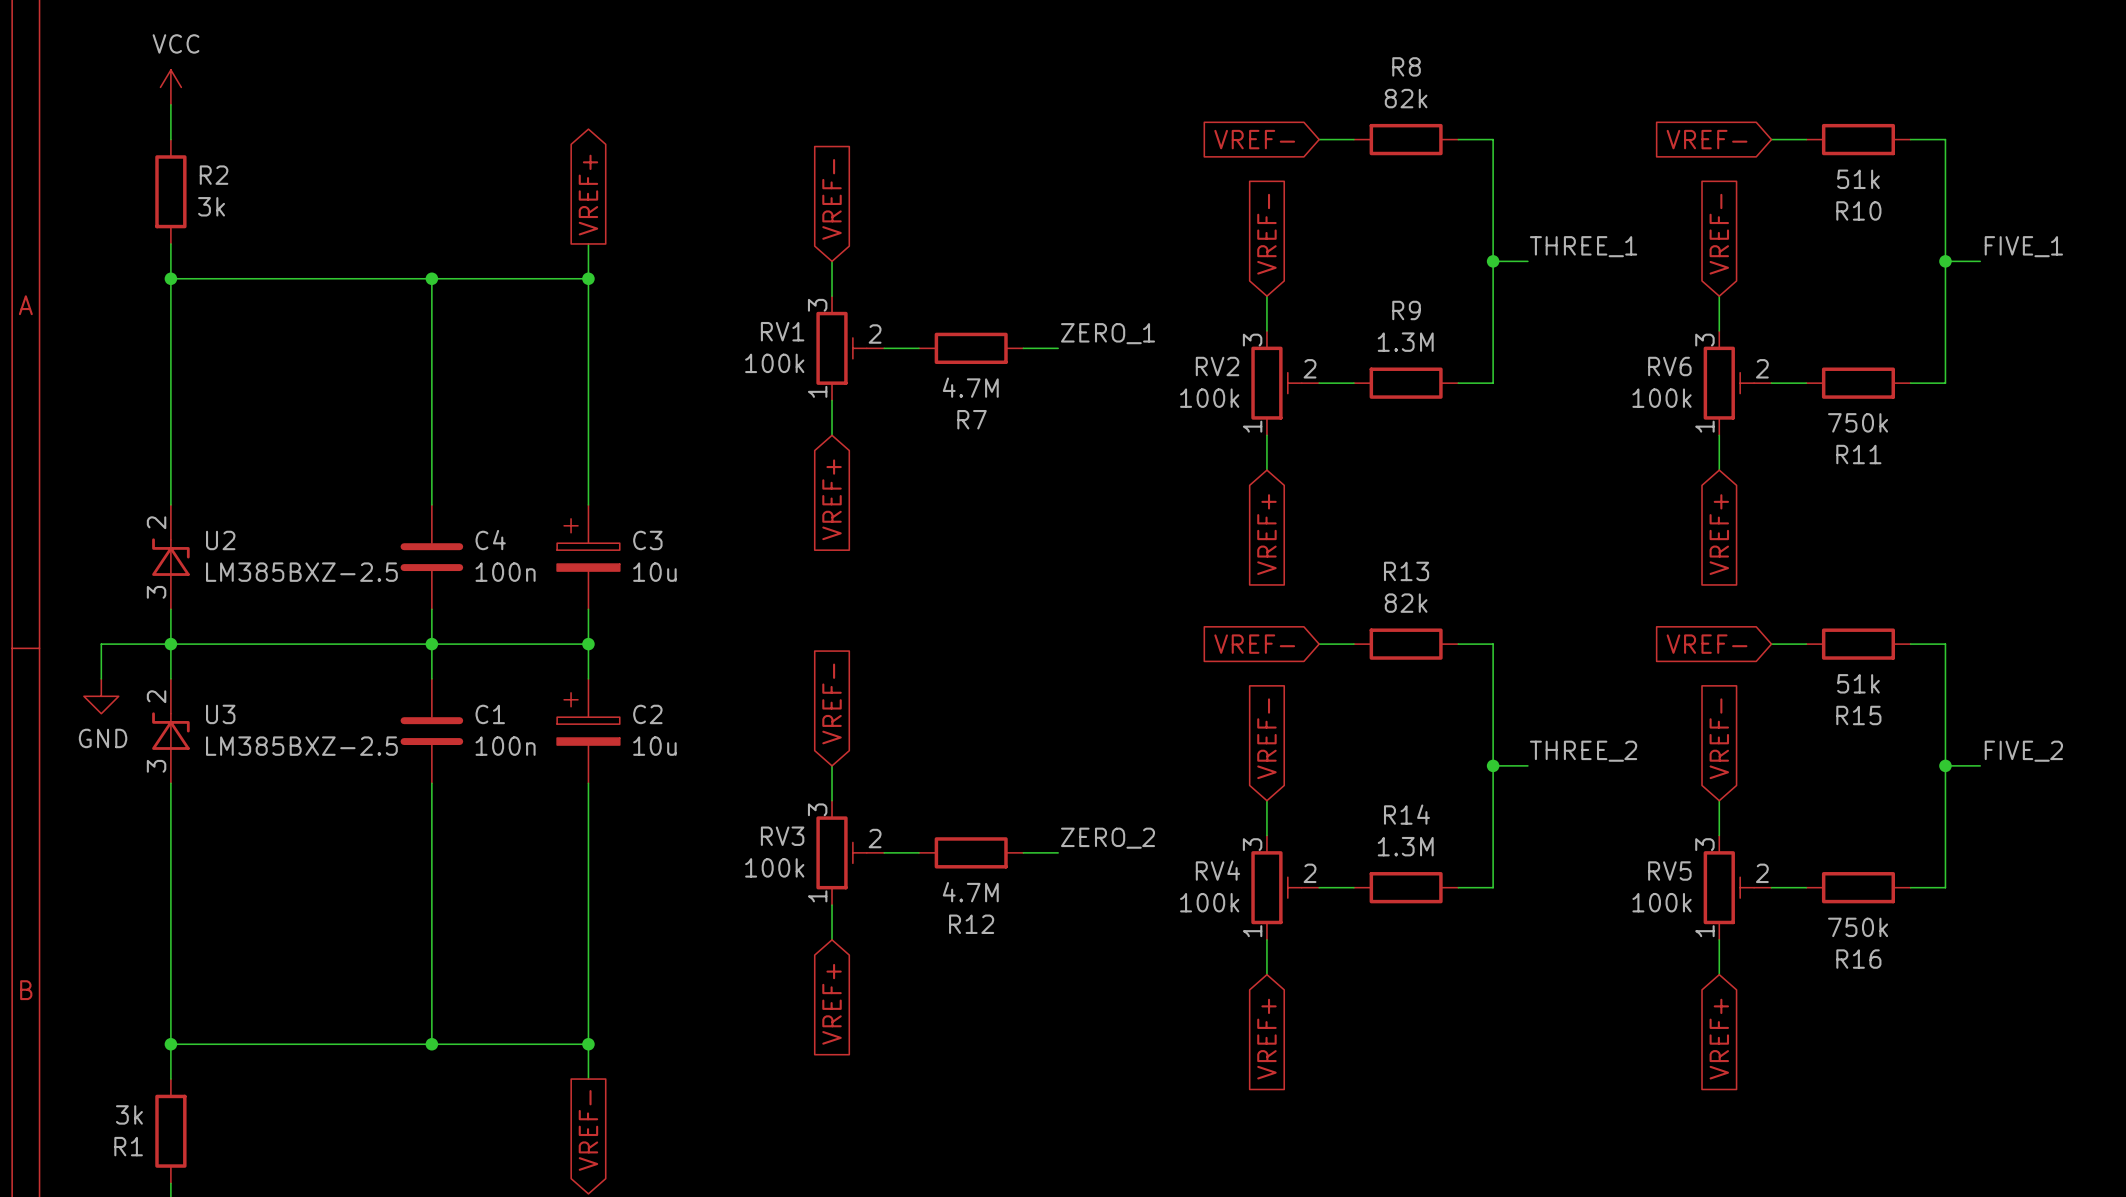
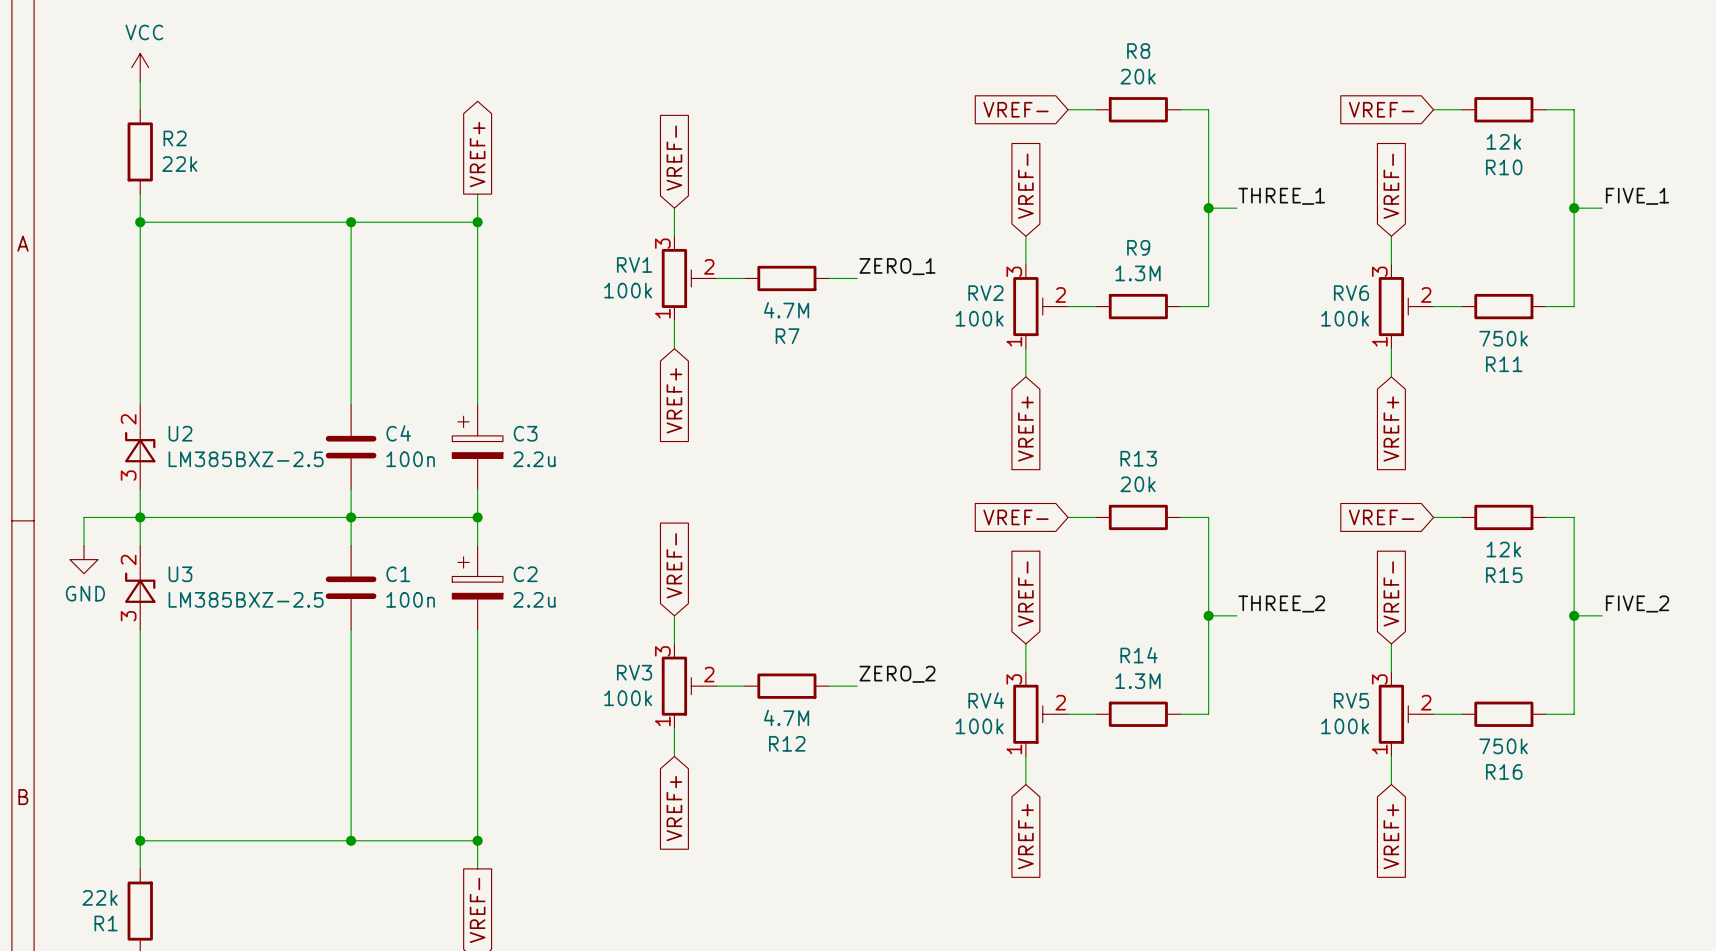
R8 value: 82k (1406, 98) -> 20k (1138, 76)
R10 value: 51k (1858, 179) -> 12k (1503, 141)
R2 value: 3k (211, 206) -> 22k (179, 164)
C3 value: 10u (654, 572) -> 2.2u (534, 459)
R13 value: 82k (1406, 603) -> 20k (1138, 484)
R15 value: 51k (1858, 683) -> 12k (1503, 549)
C2 value: 10u (654, 746) -> 2.2u (534, 599)
R1 value: 3k (129, 1114) -> 22k (100, 897)

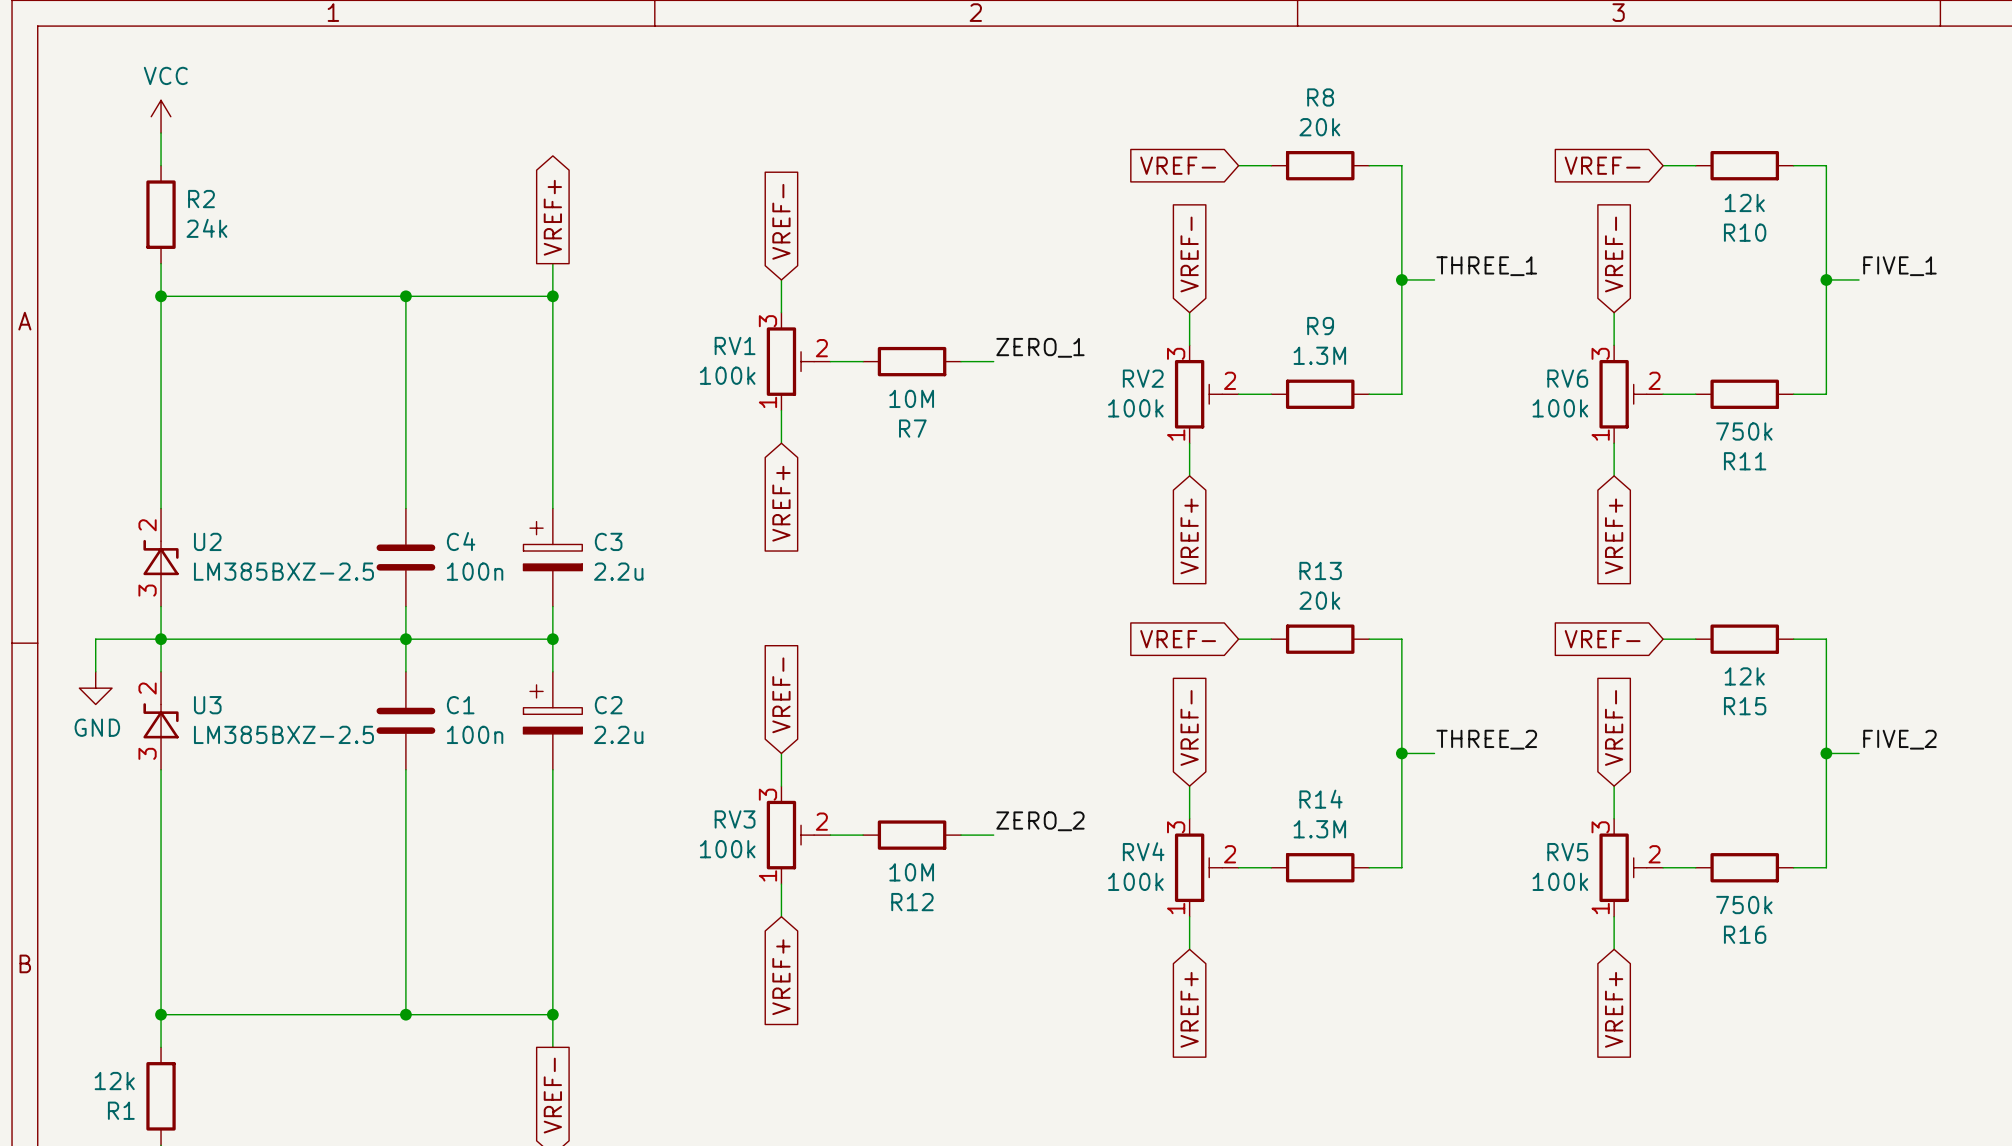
R2 value: 22k (179, 164) -> 24k (206, 228)
R7 value: 4.7M (786, 310) -> 10M (911, 398)
R12 value: 4.7M (786, 717) -> 10M (911, 872)
R1 value: 22k (100, 897) -> 12k (114, 1081)

